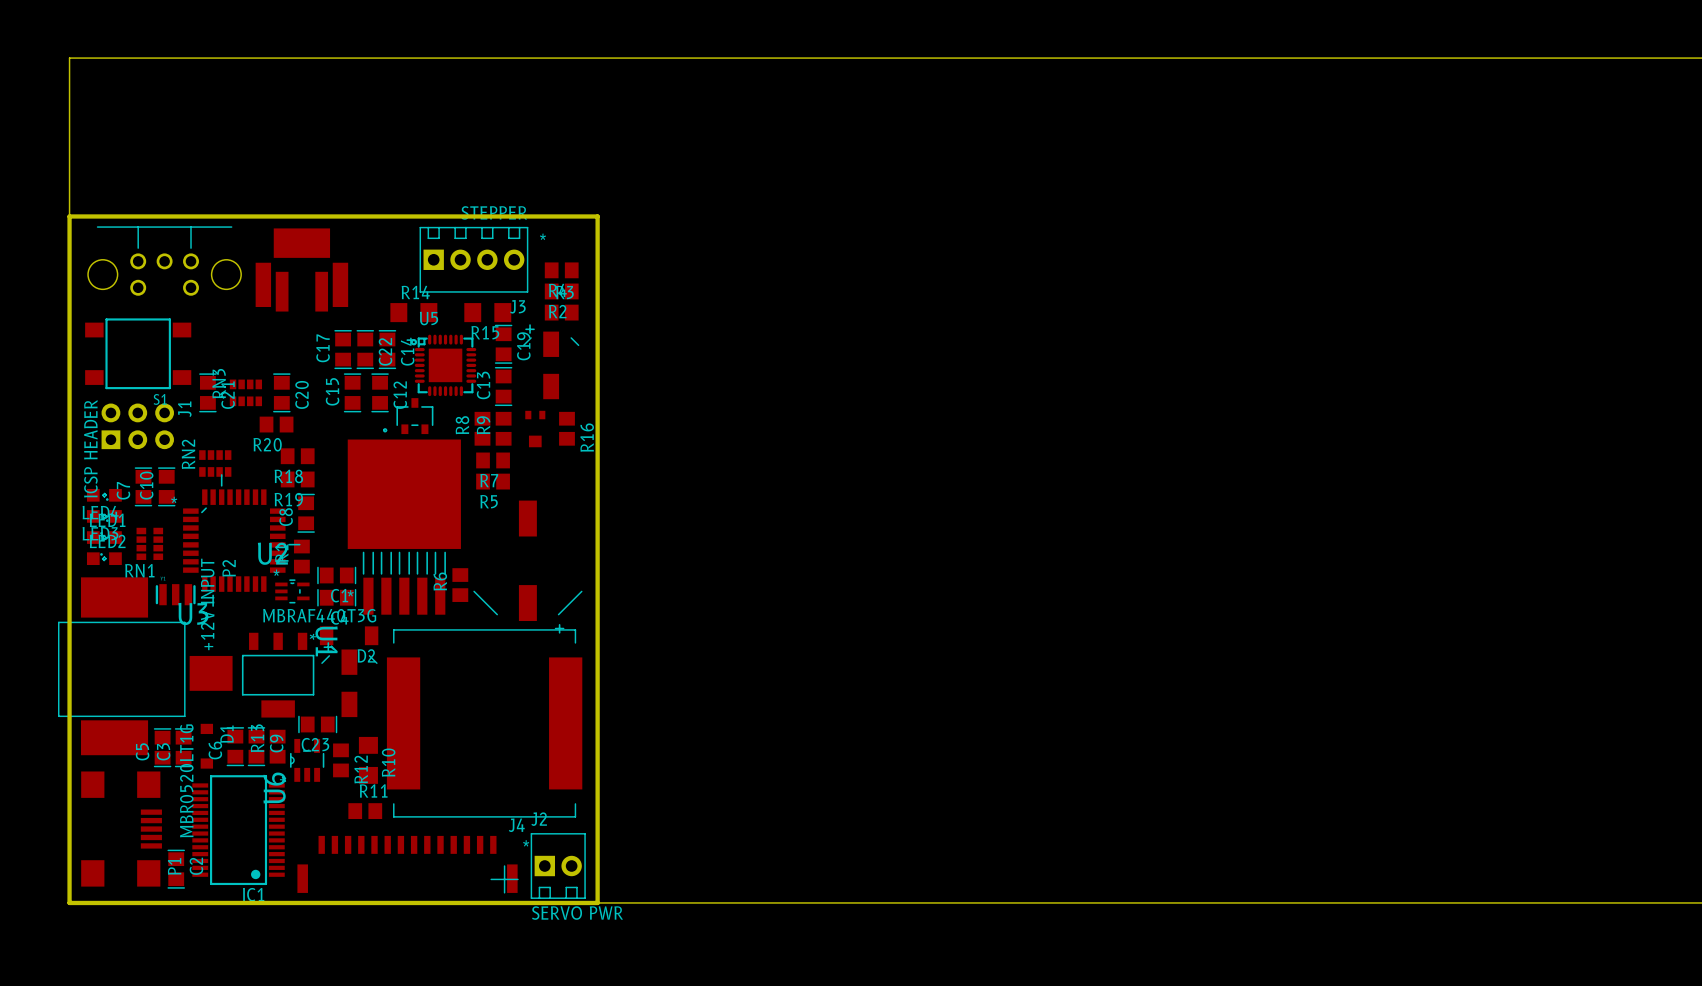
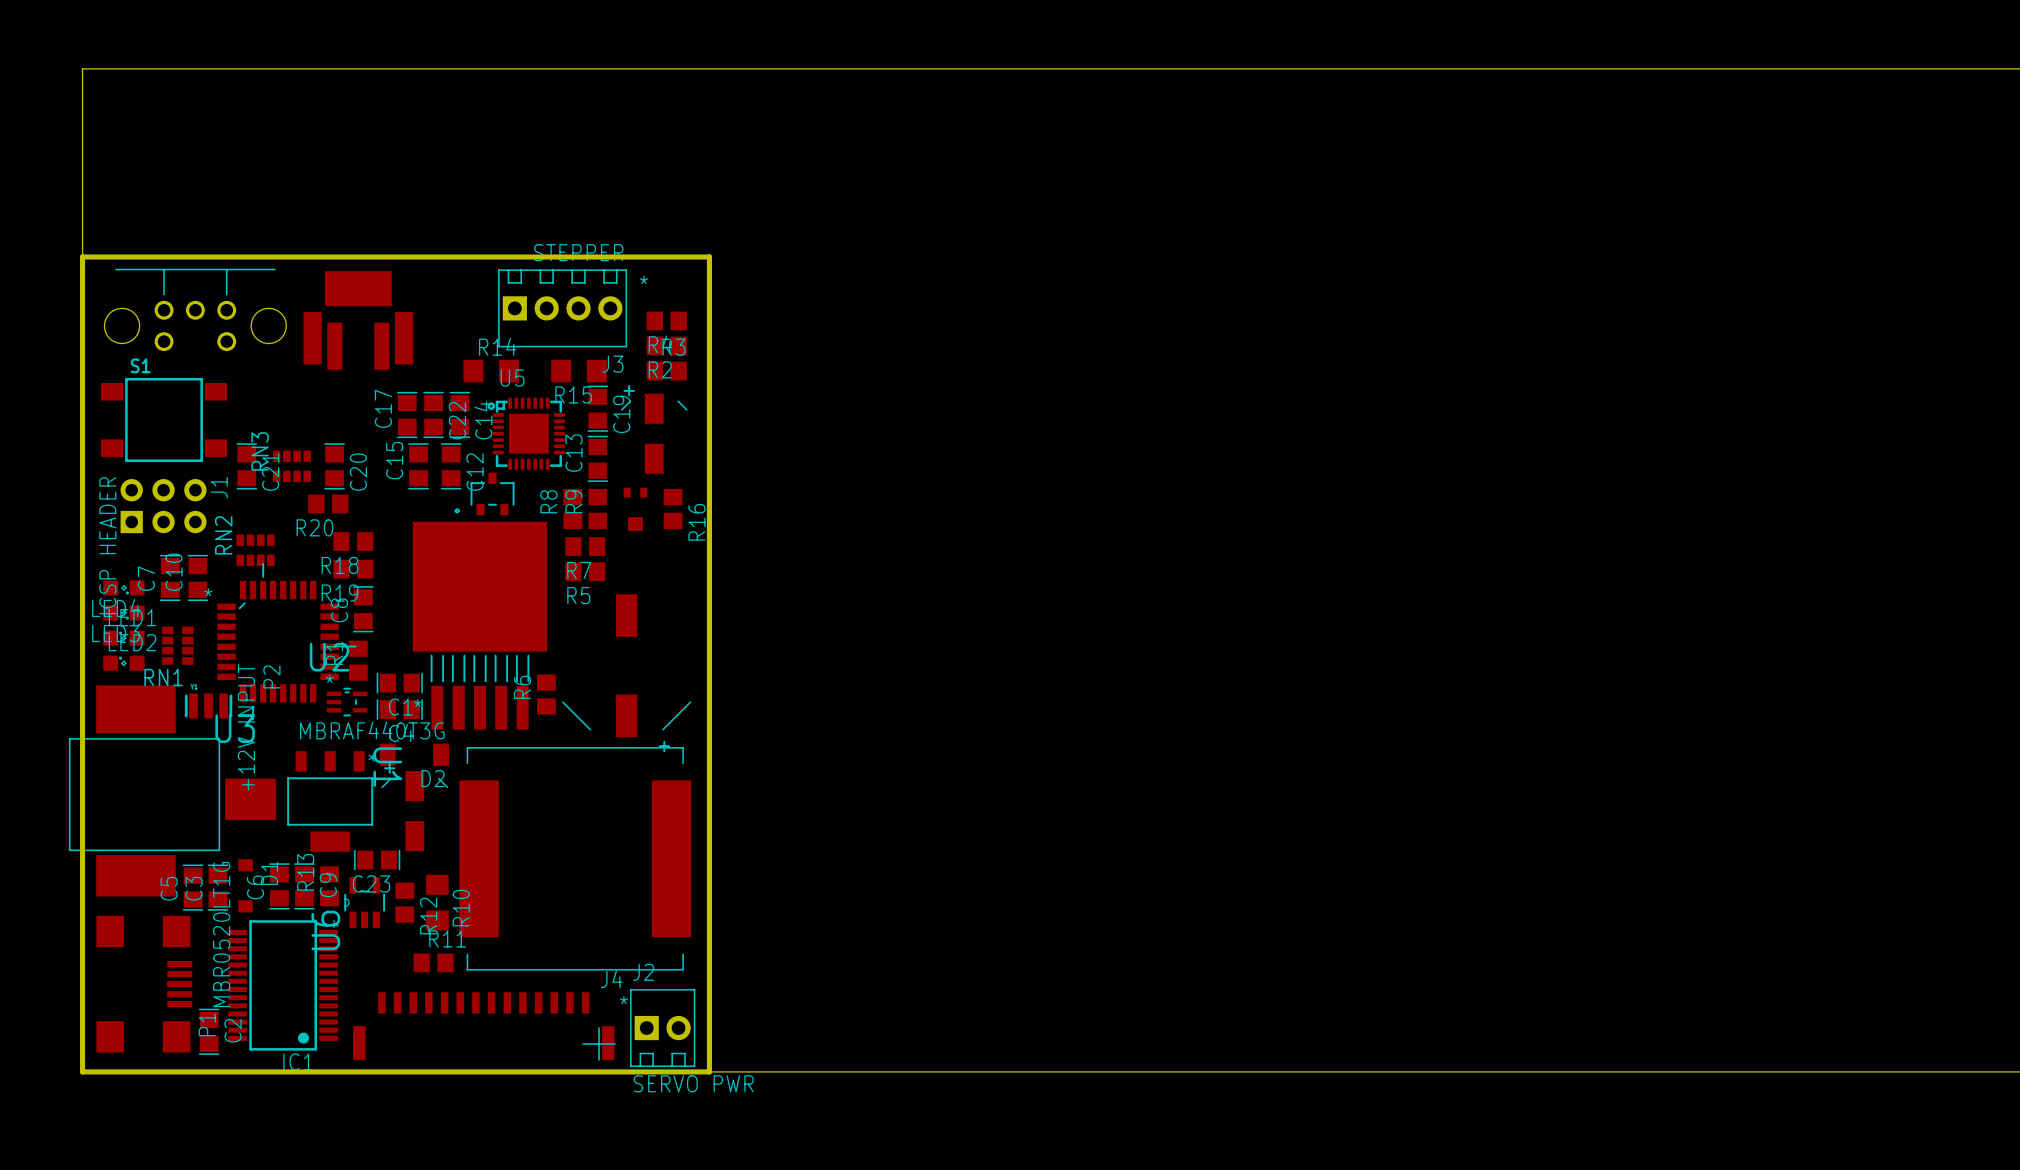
S1 name position: S1 (160, 399) -> S1 (140, 365)

